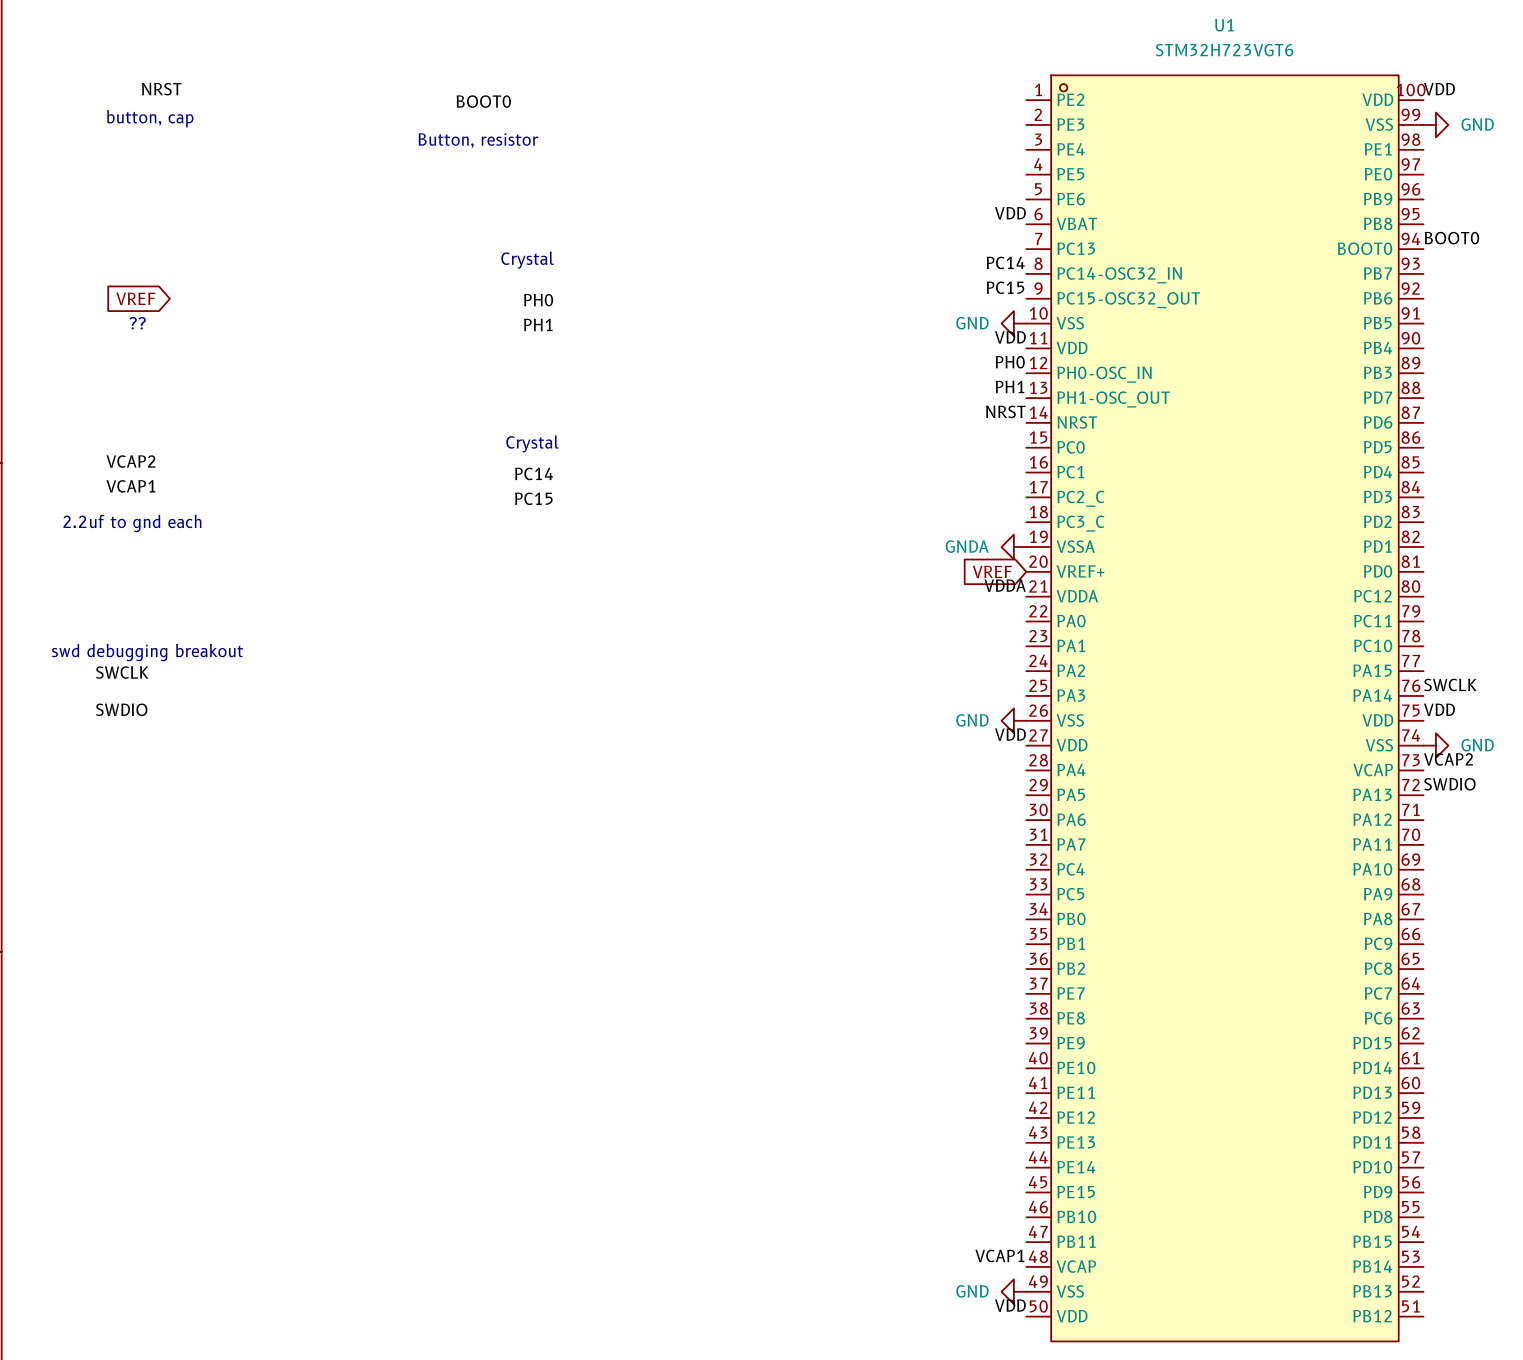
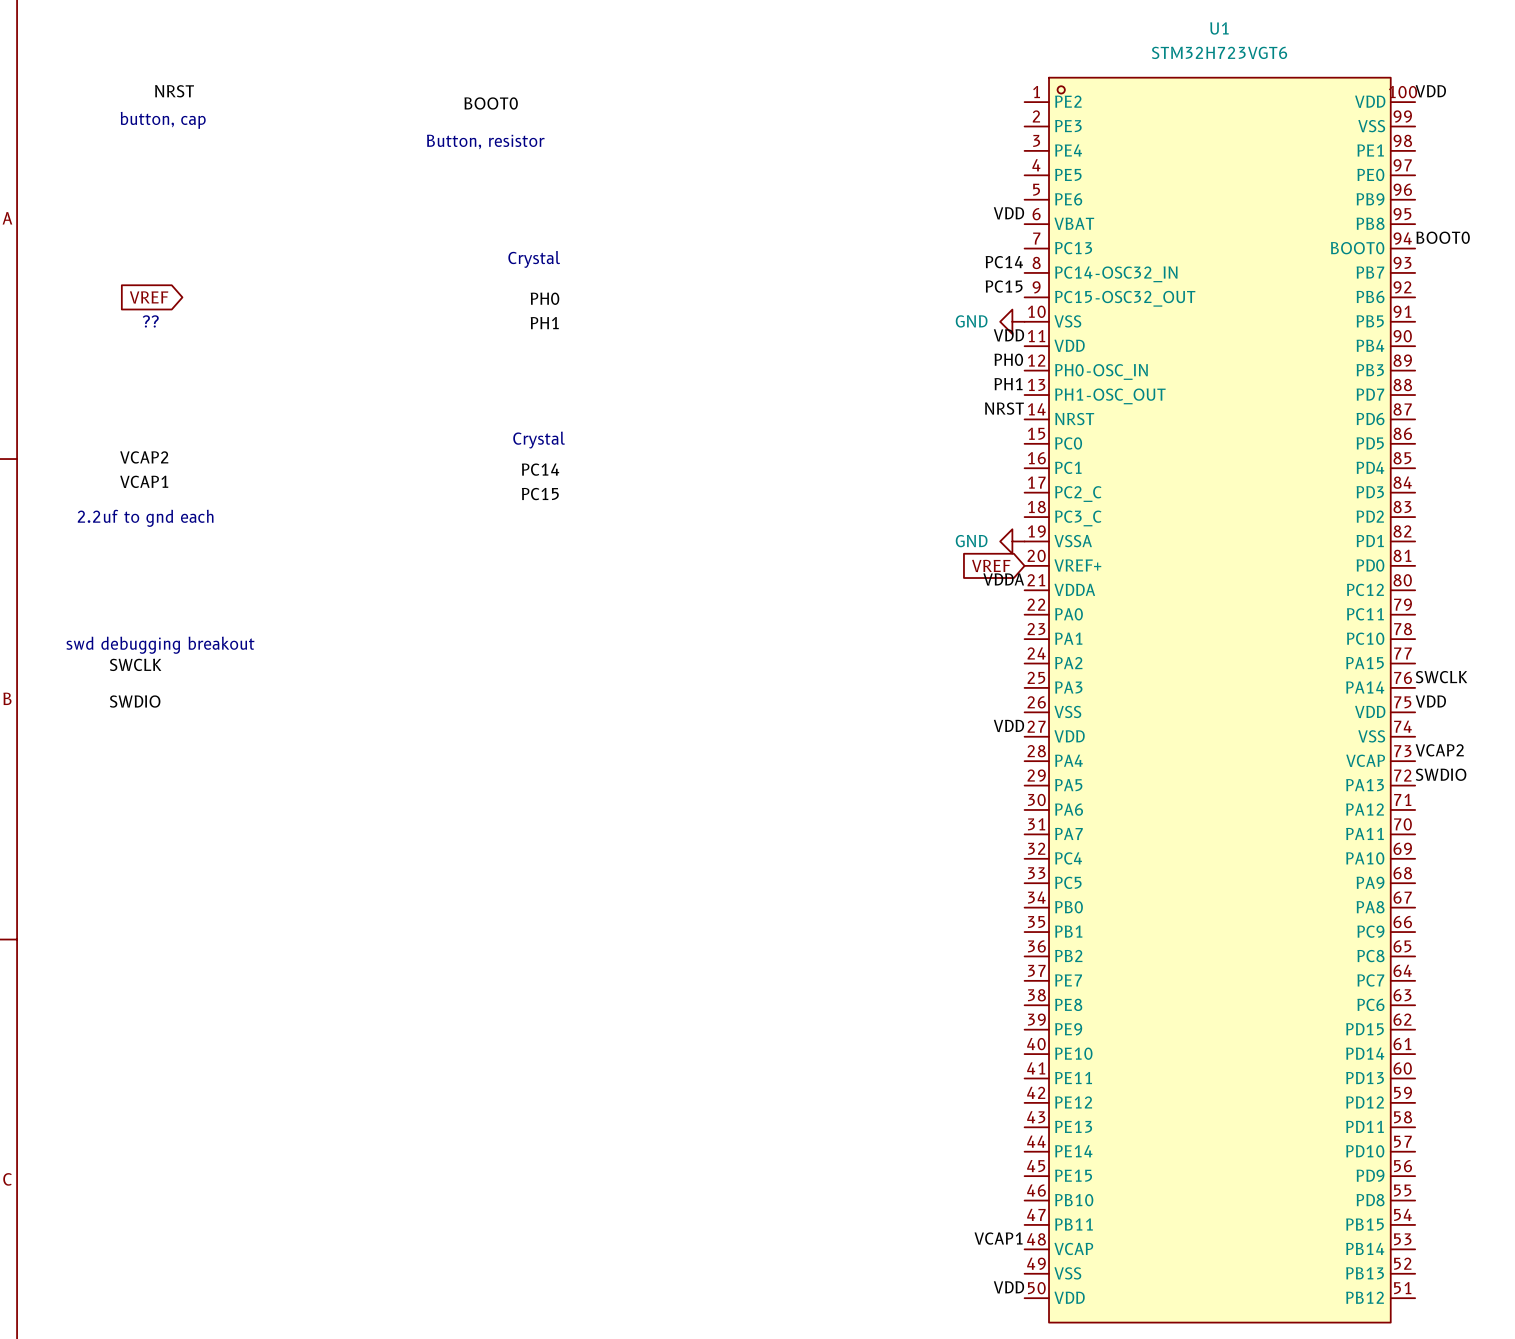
power symbol: GND (1435, 124) -> none
power symbol: GNDA (1013, 547) -> GND (1012, 541)
power symbol: GND (1013, 720) -> none
power symbol: GND (1435, 745) -> none
power symbol: GND (1013, 1291) -> none

